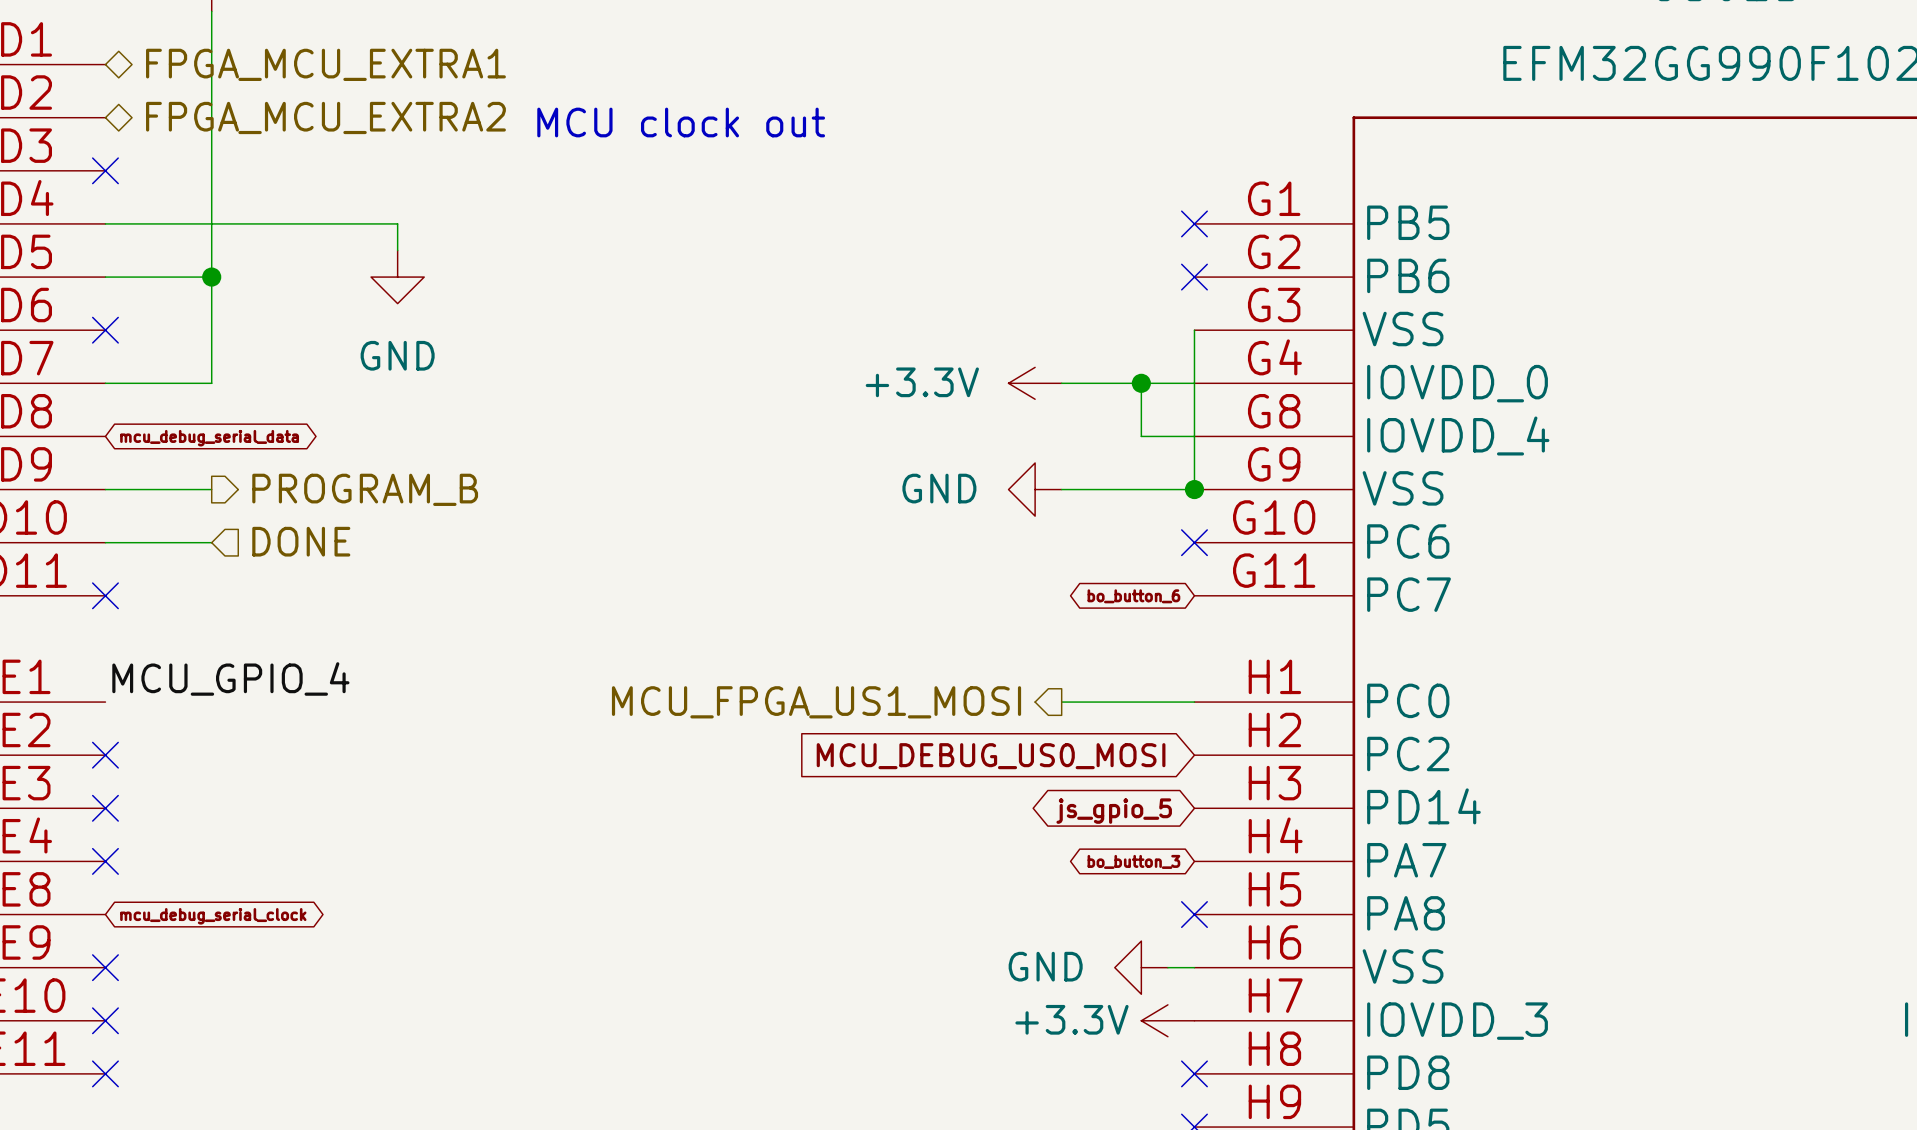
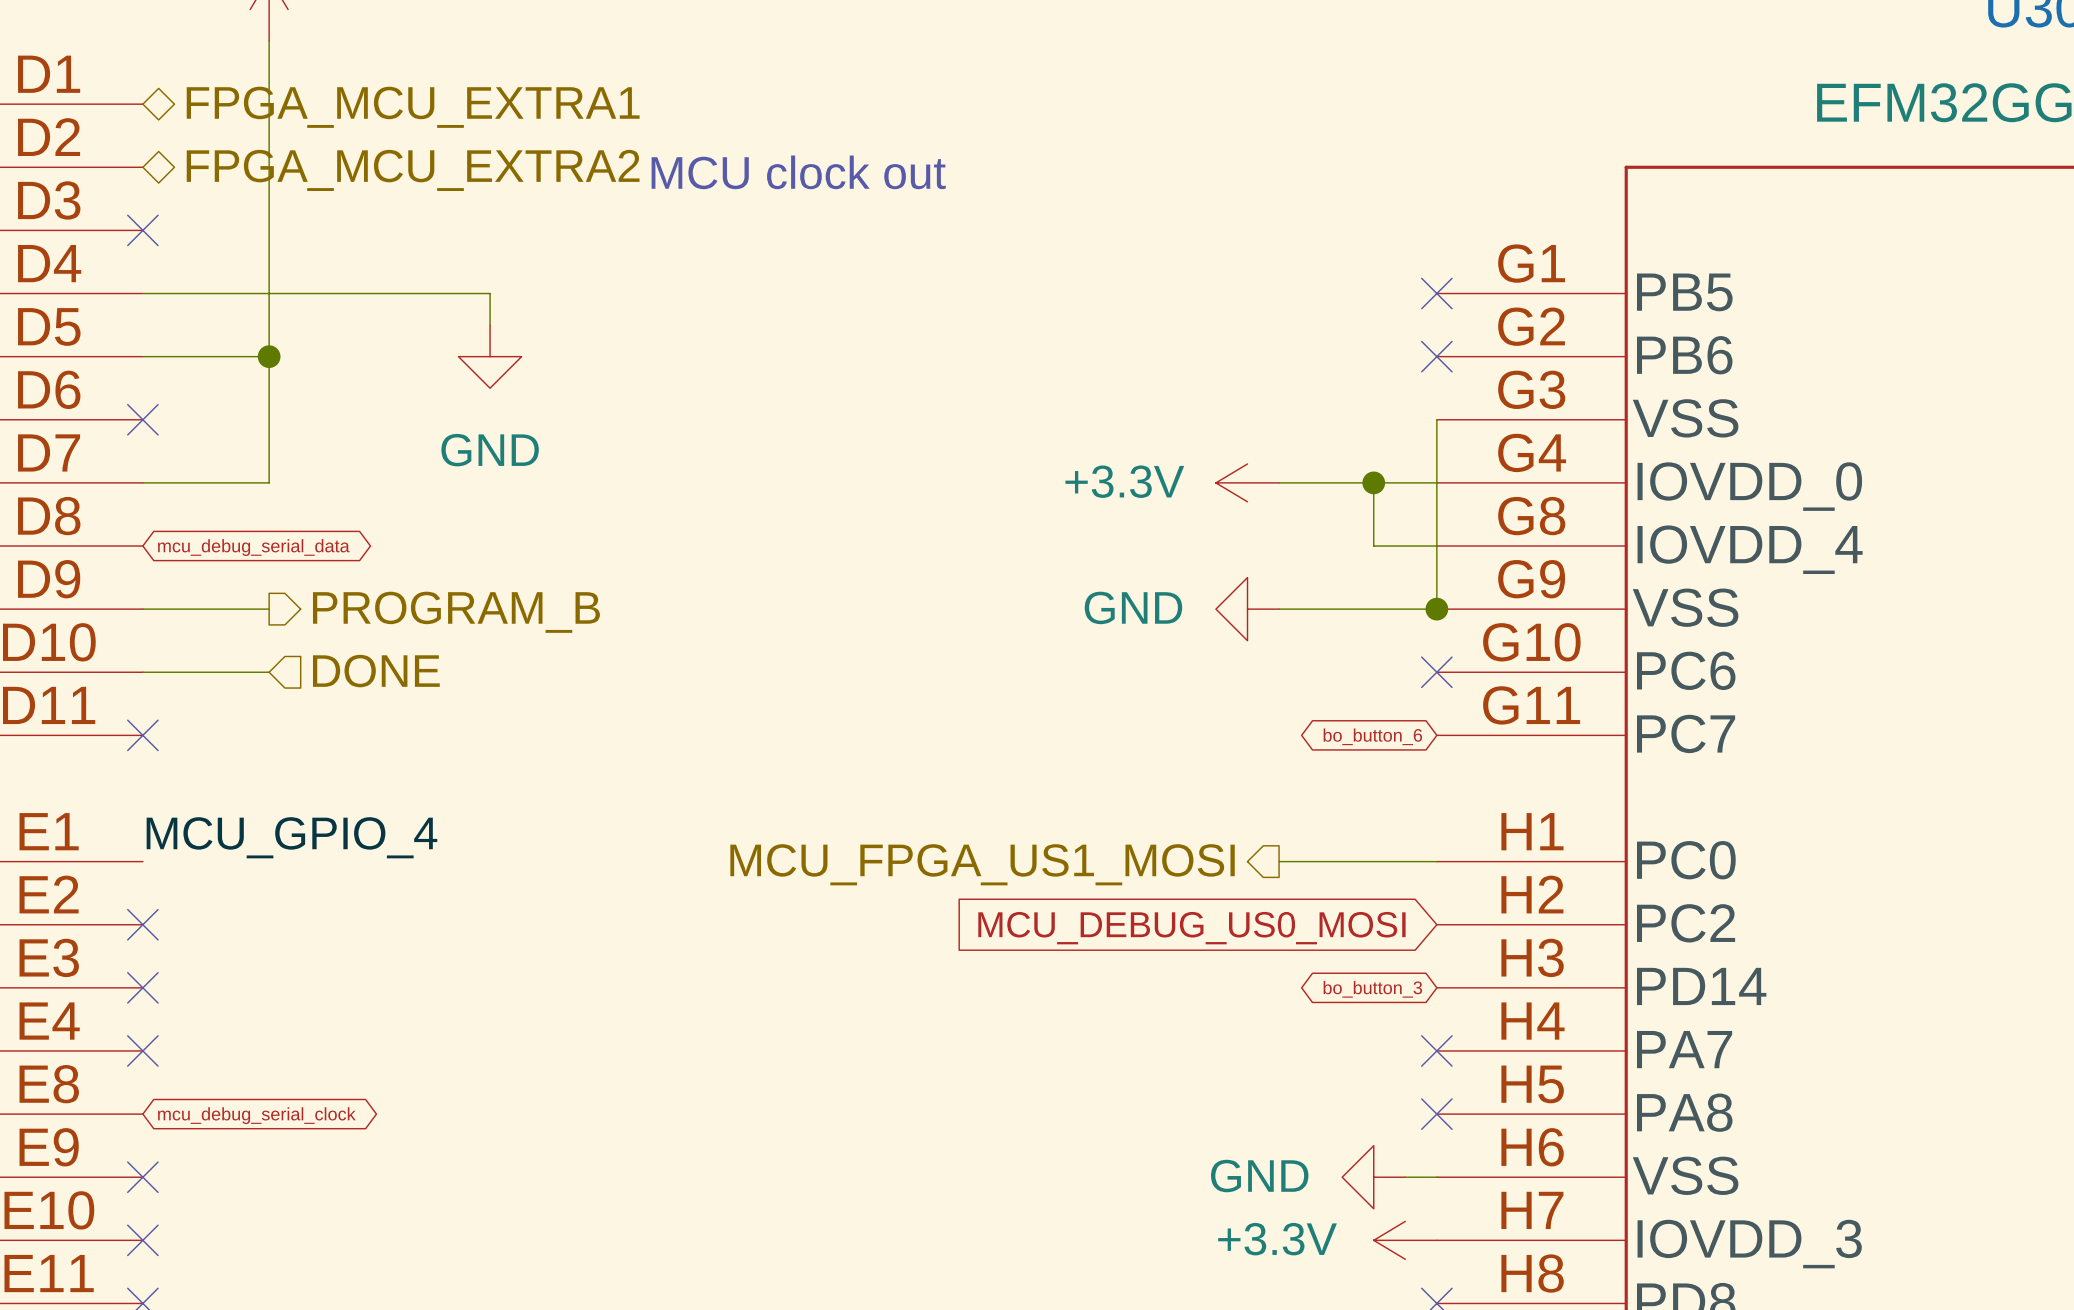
global label: js_gpio_5 (1114, 811) -> bo_button_3 (1372, 989)
global label: bo_button_3 (1133, 861) -> none
no-connect mark: none -> (1436, 1050)

